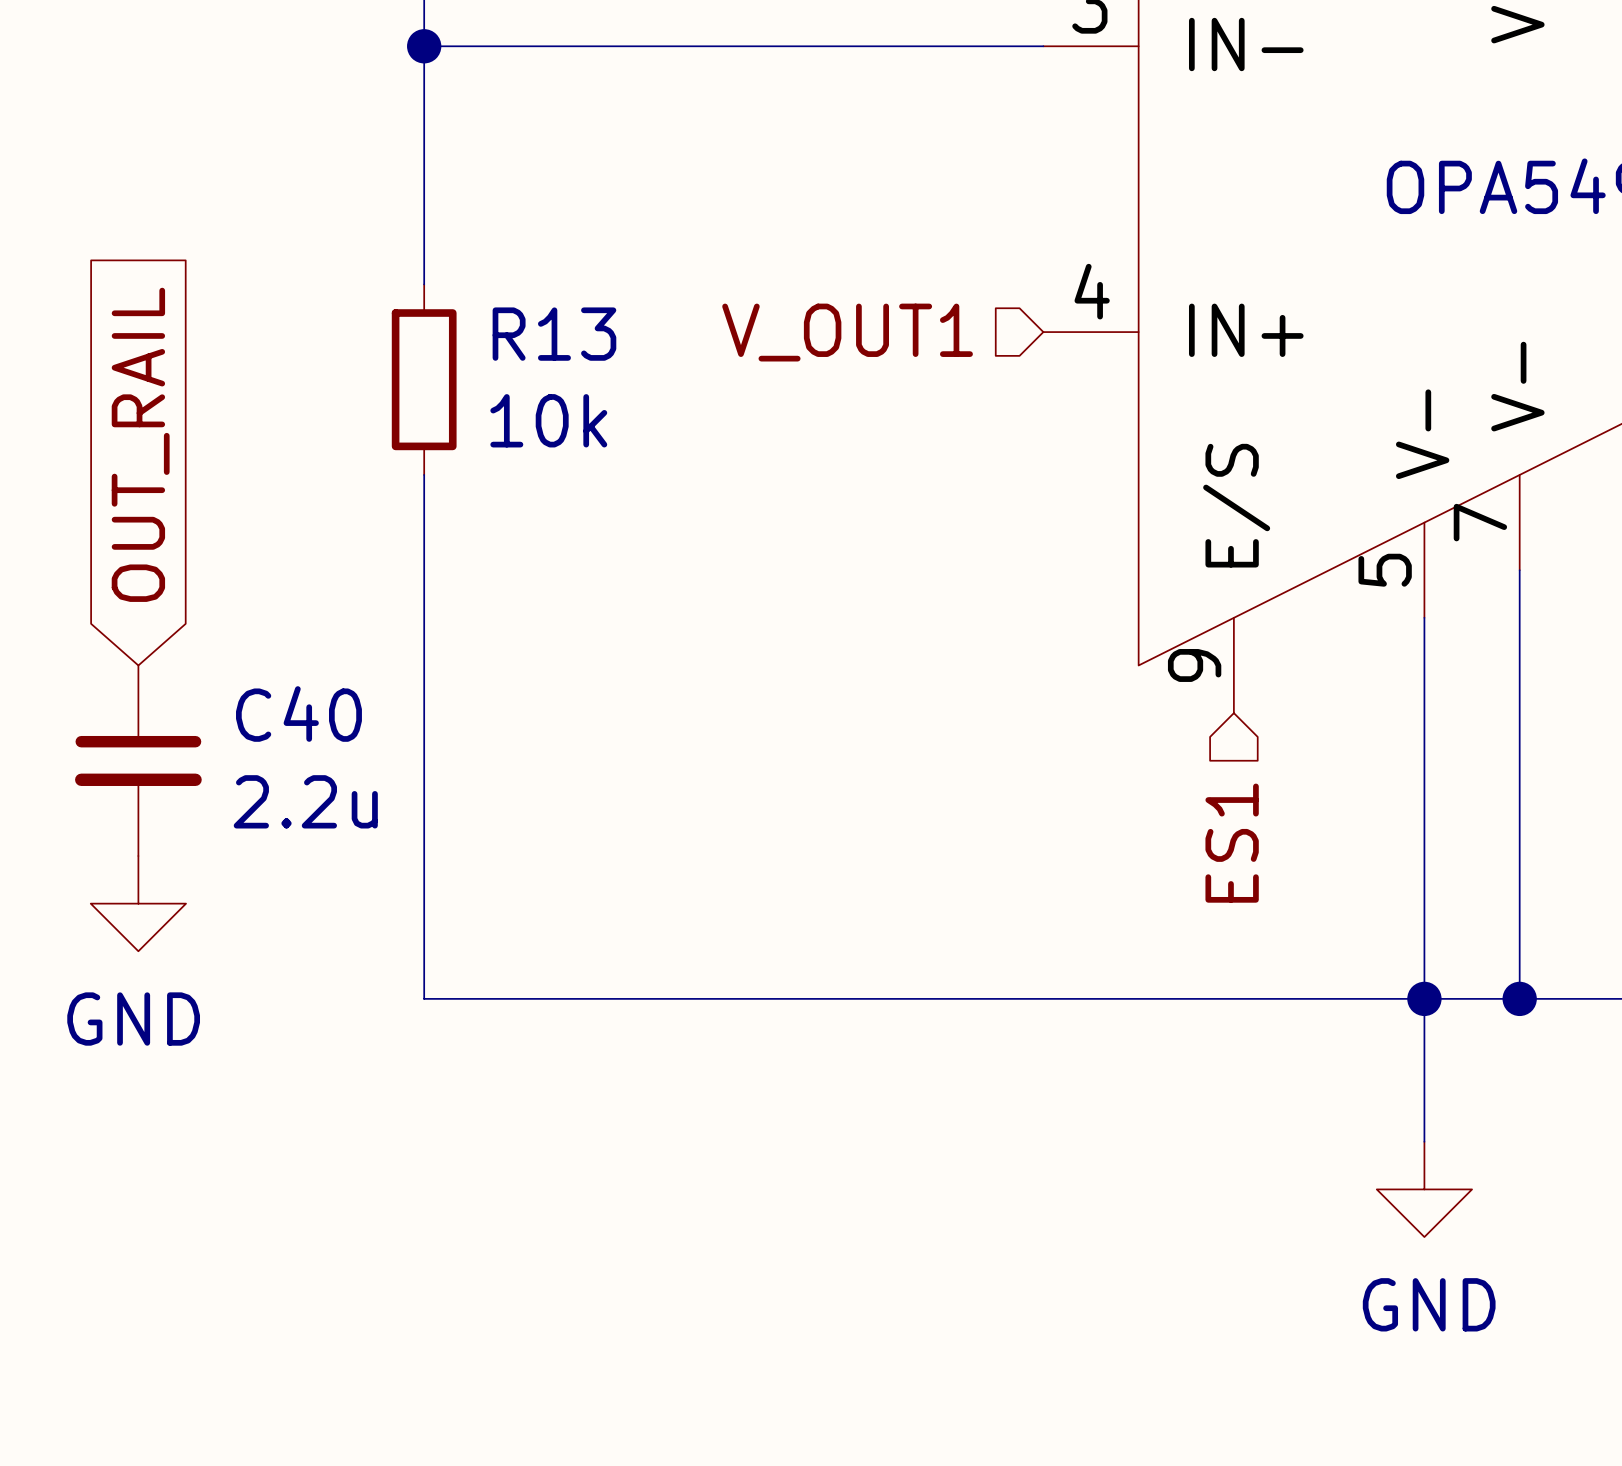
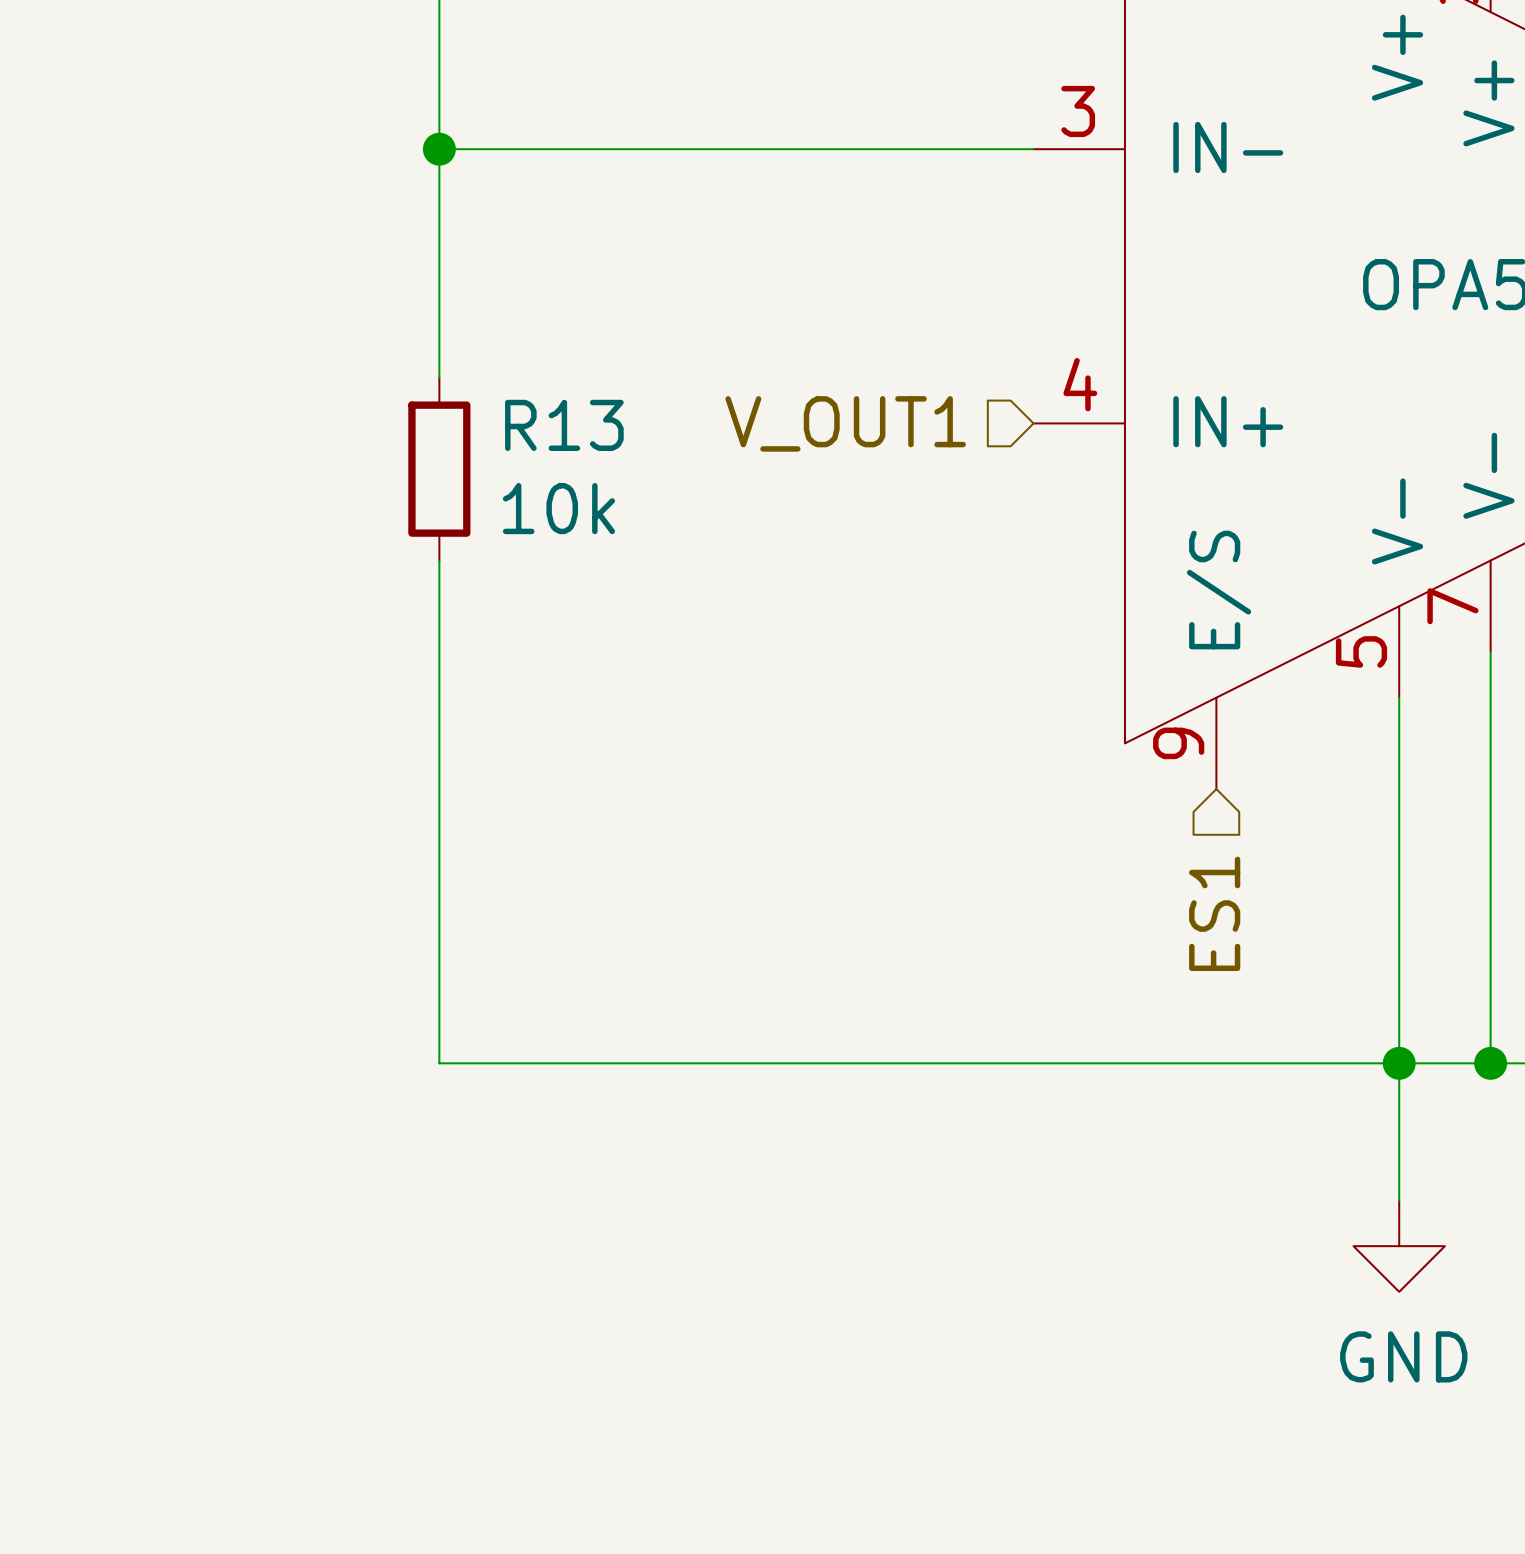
global label: OUT_RAIL (140, 444) -> none
C40: 2.2u (138, 760) -> none
power symbol: GND (138, 903) -> none

